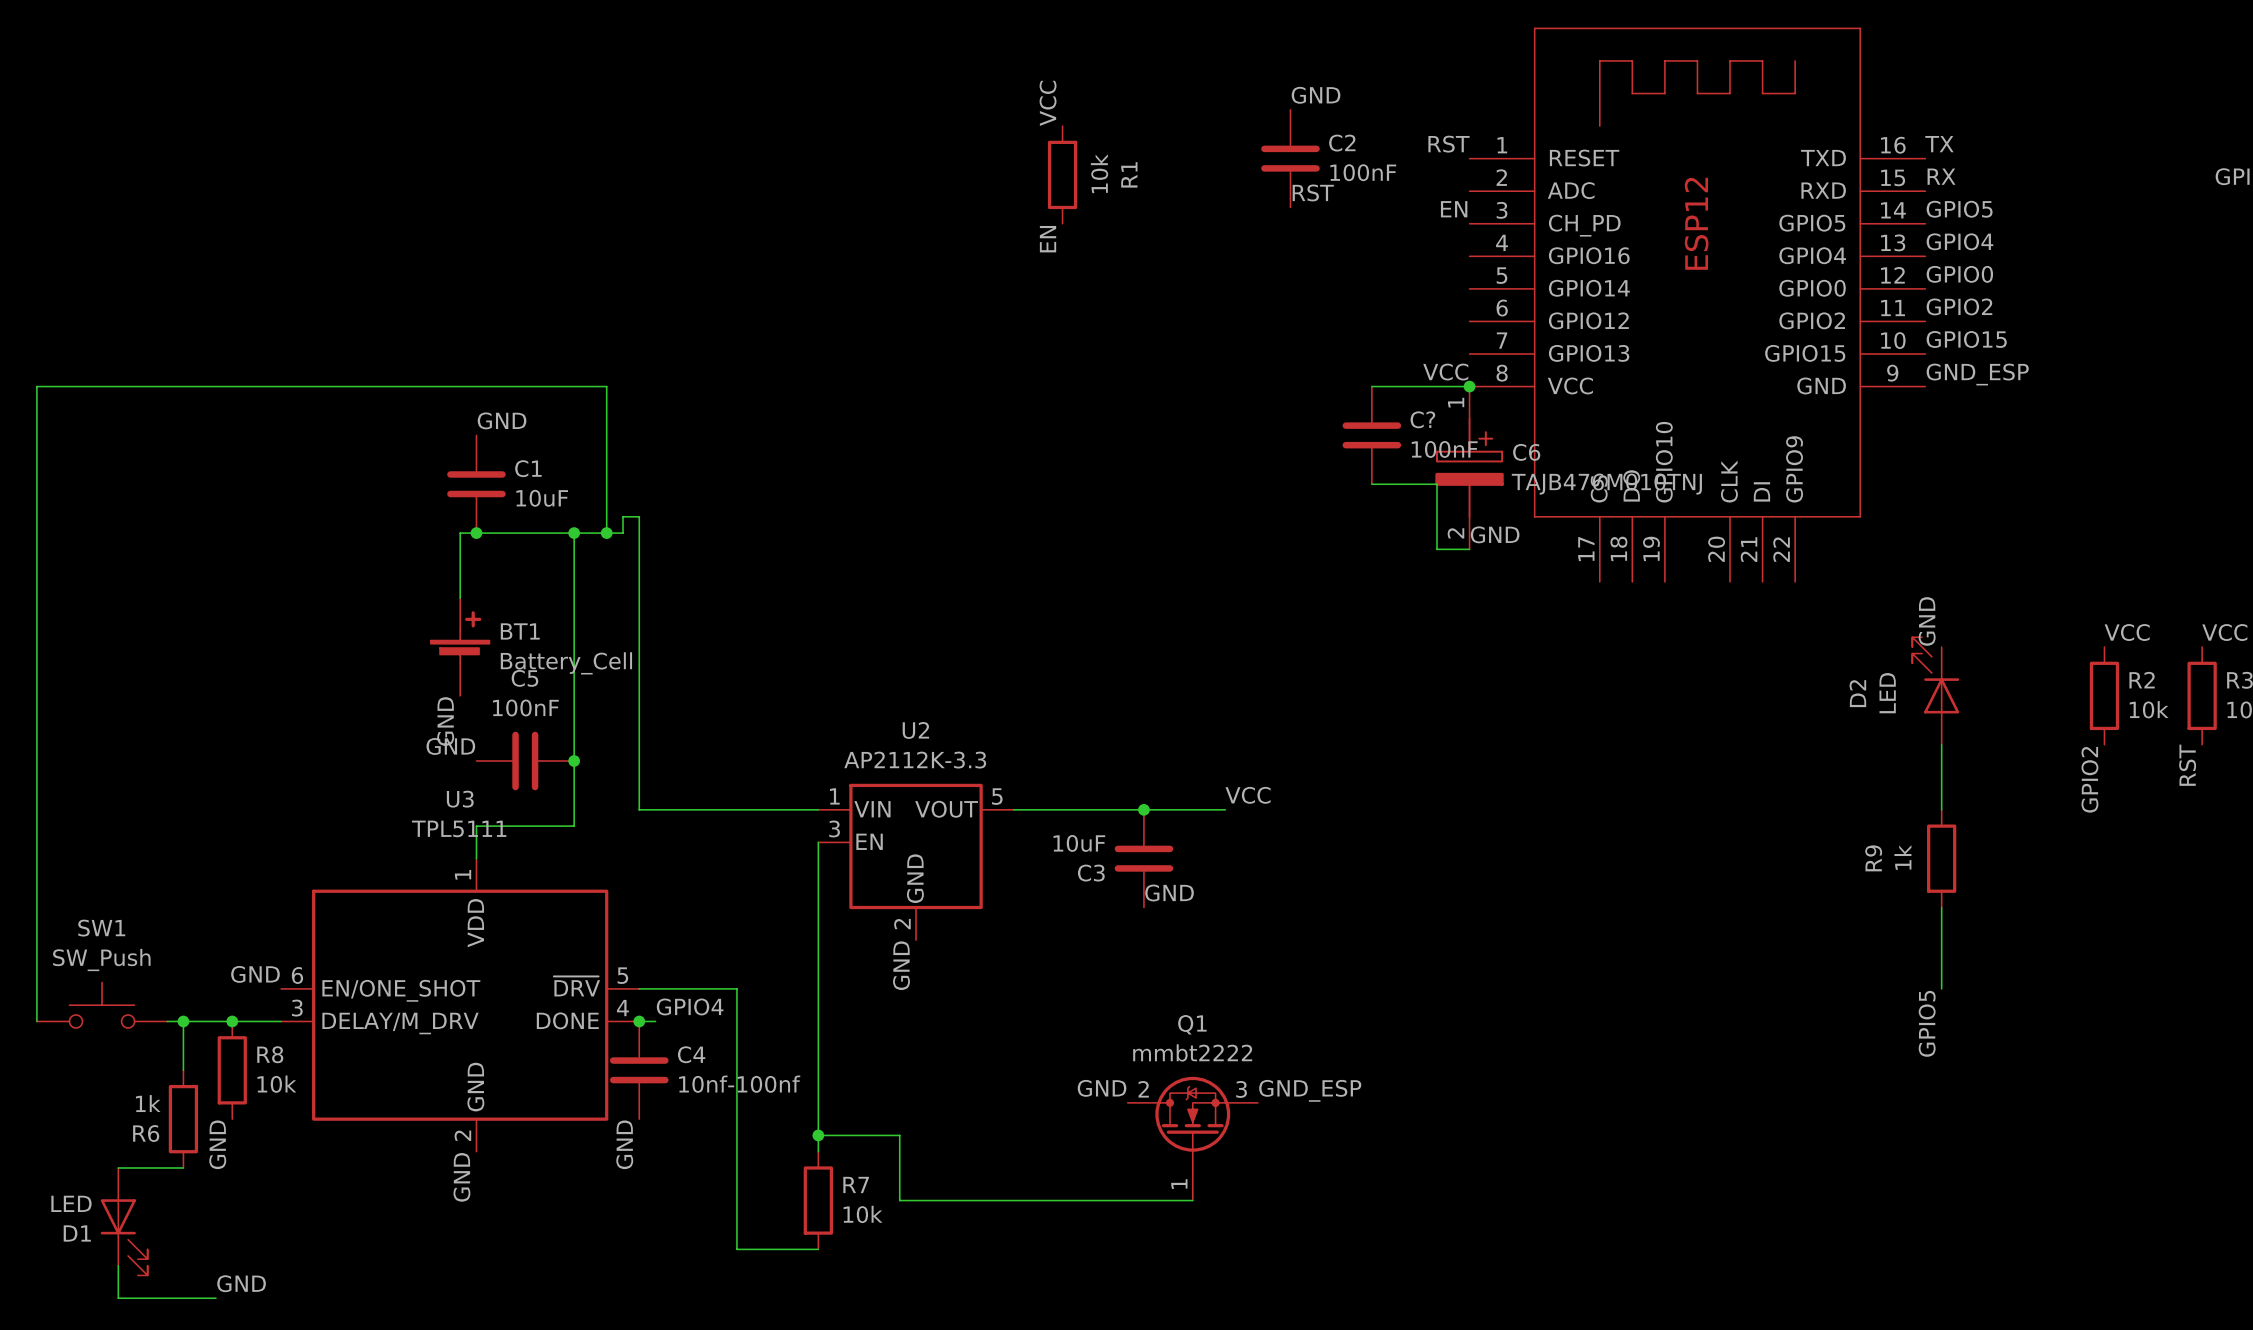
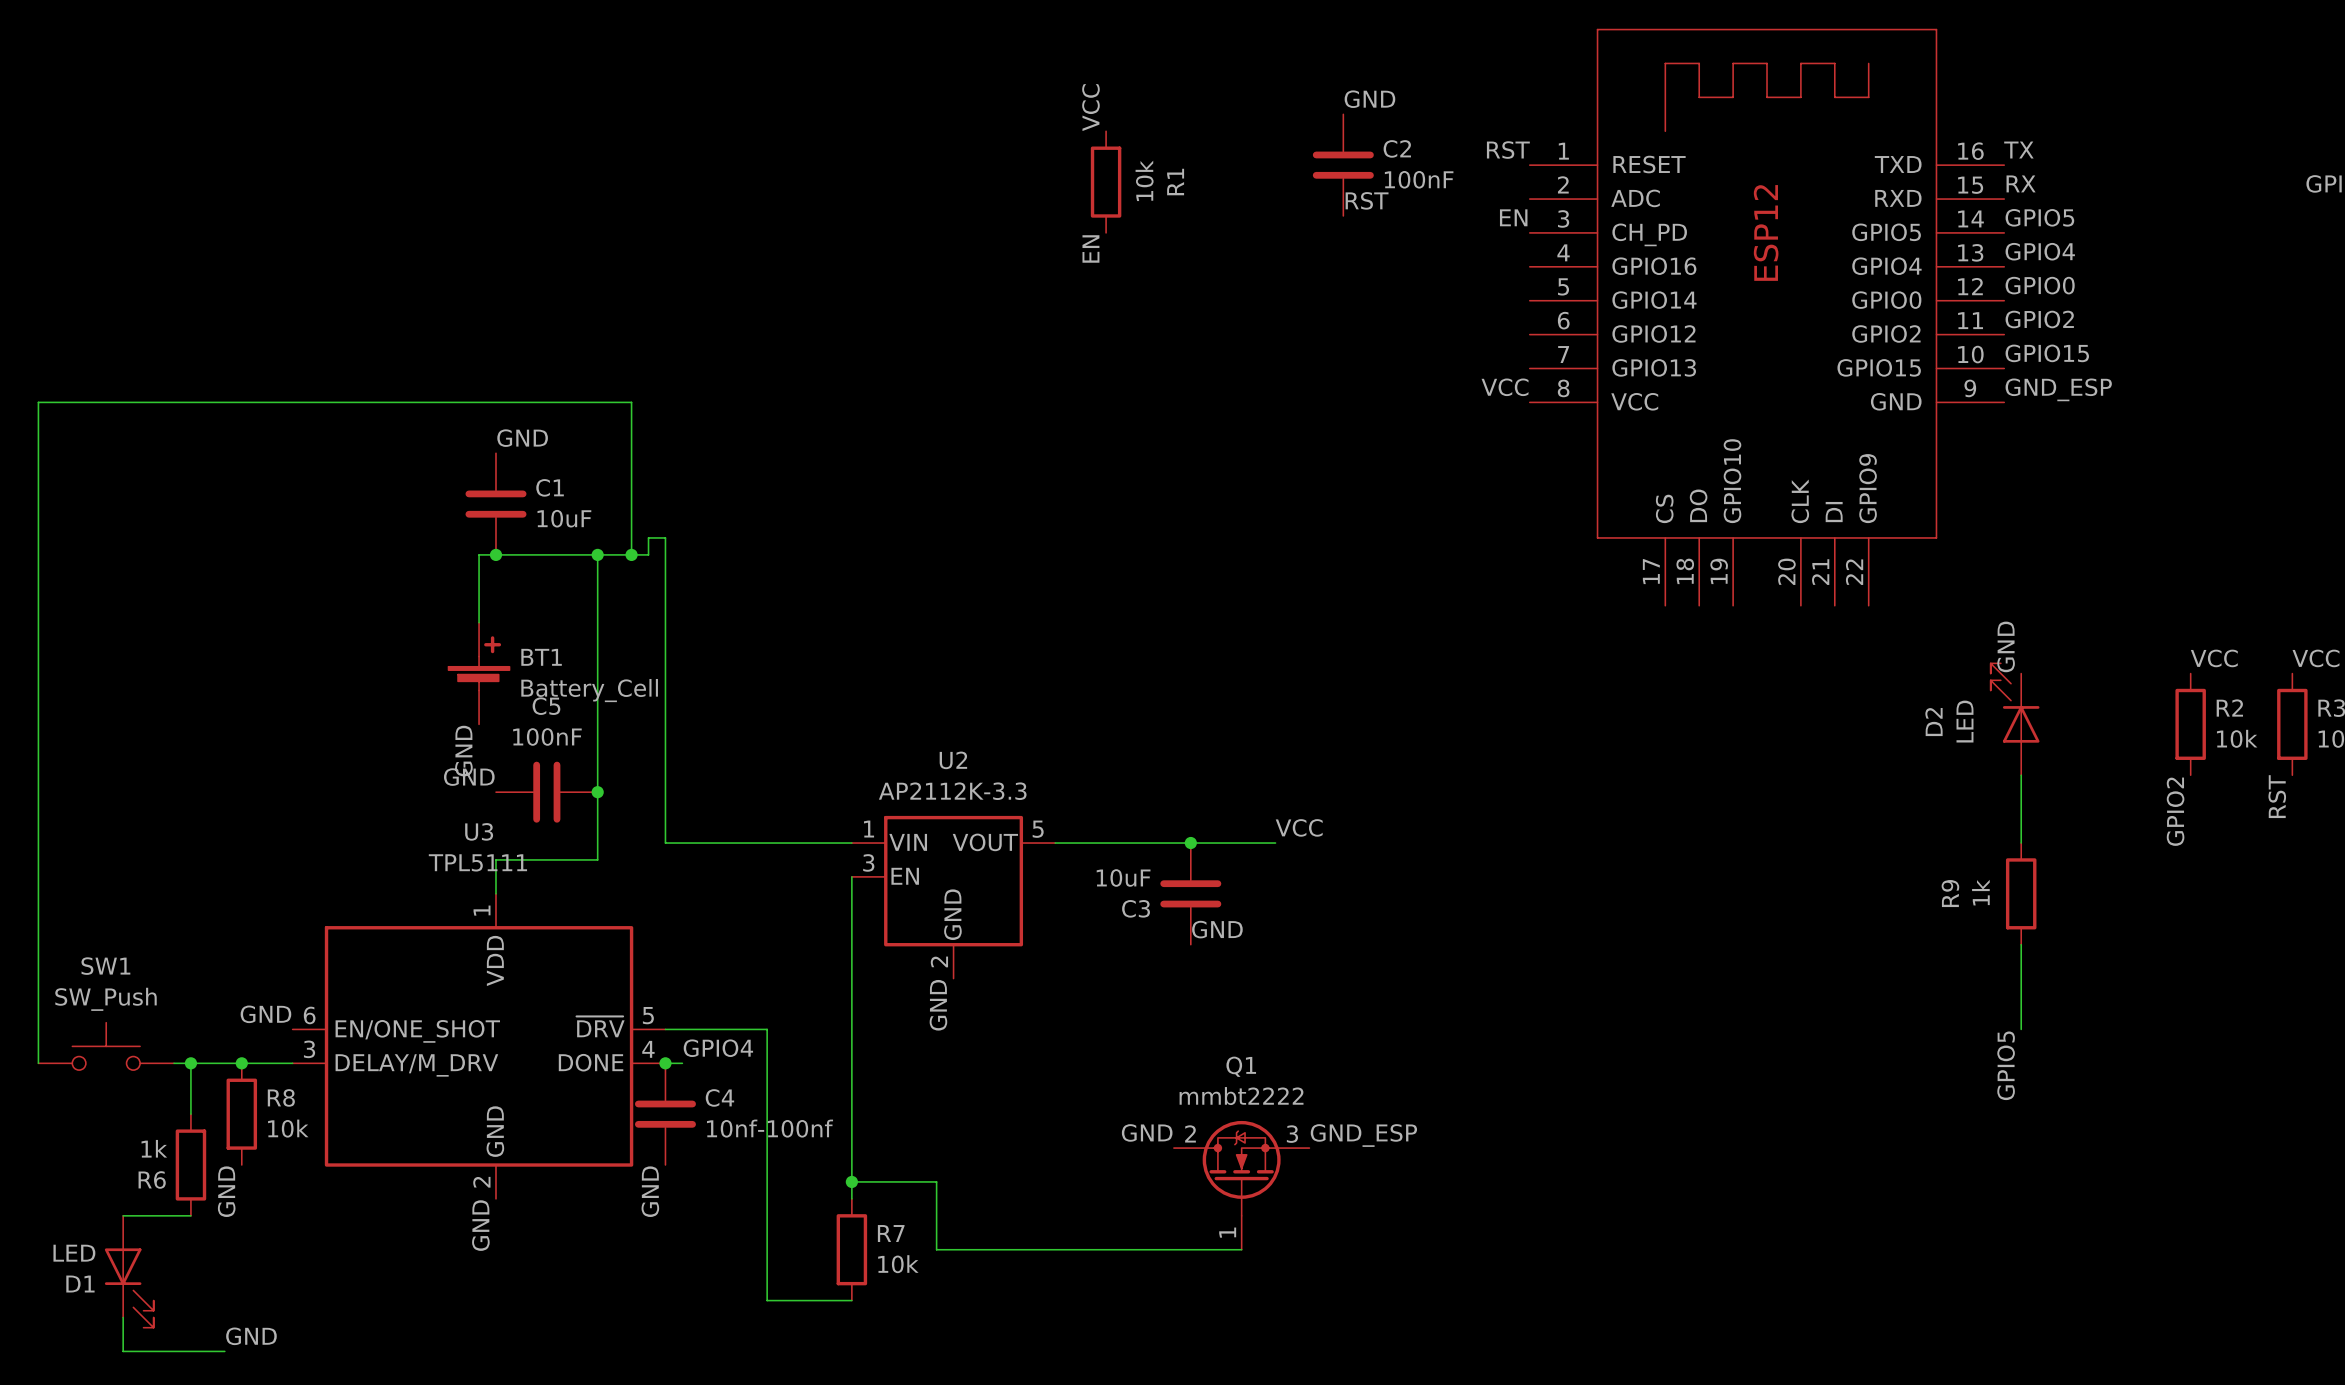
wire: (1371, 386) (1469, 386) -> none
junction: (1469, 386) -> none
C?: 100nF (1371, 435) -> none
C6: TAJB476M010TNJ (1469, 467) -> none
wire: (1371, 484) (1436, 484) (1436, 549) (1469, 549) -> none
label: GND (1495, 534) -> none

